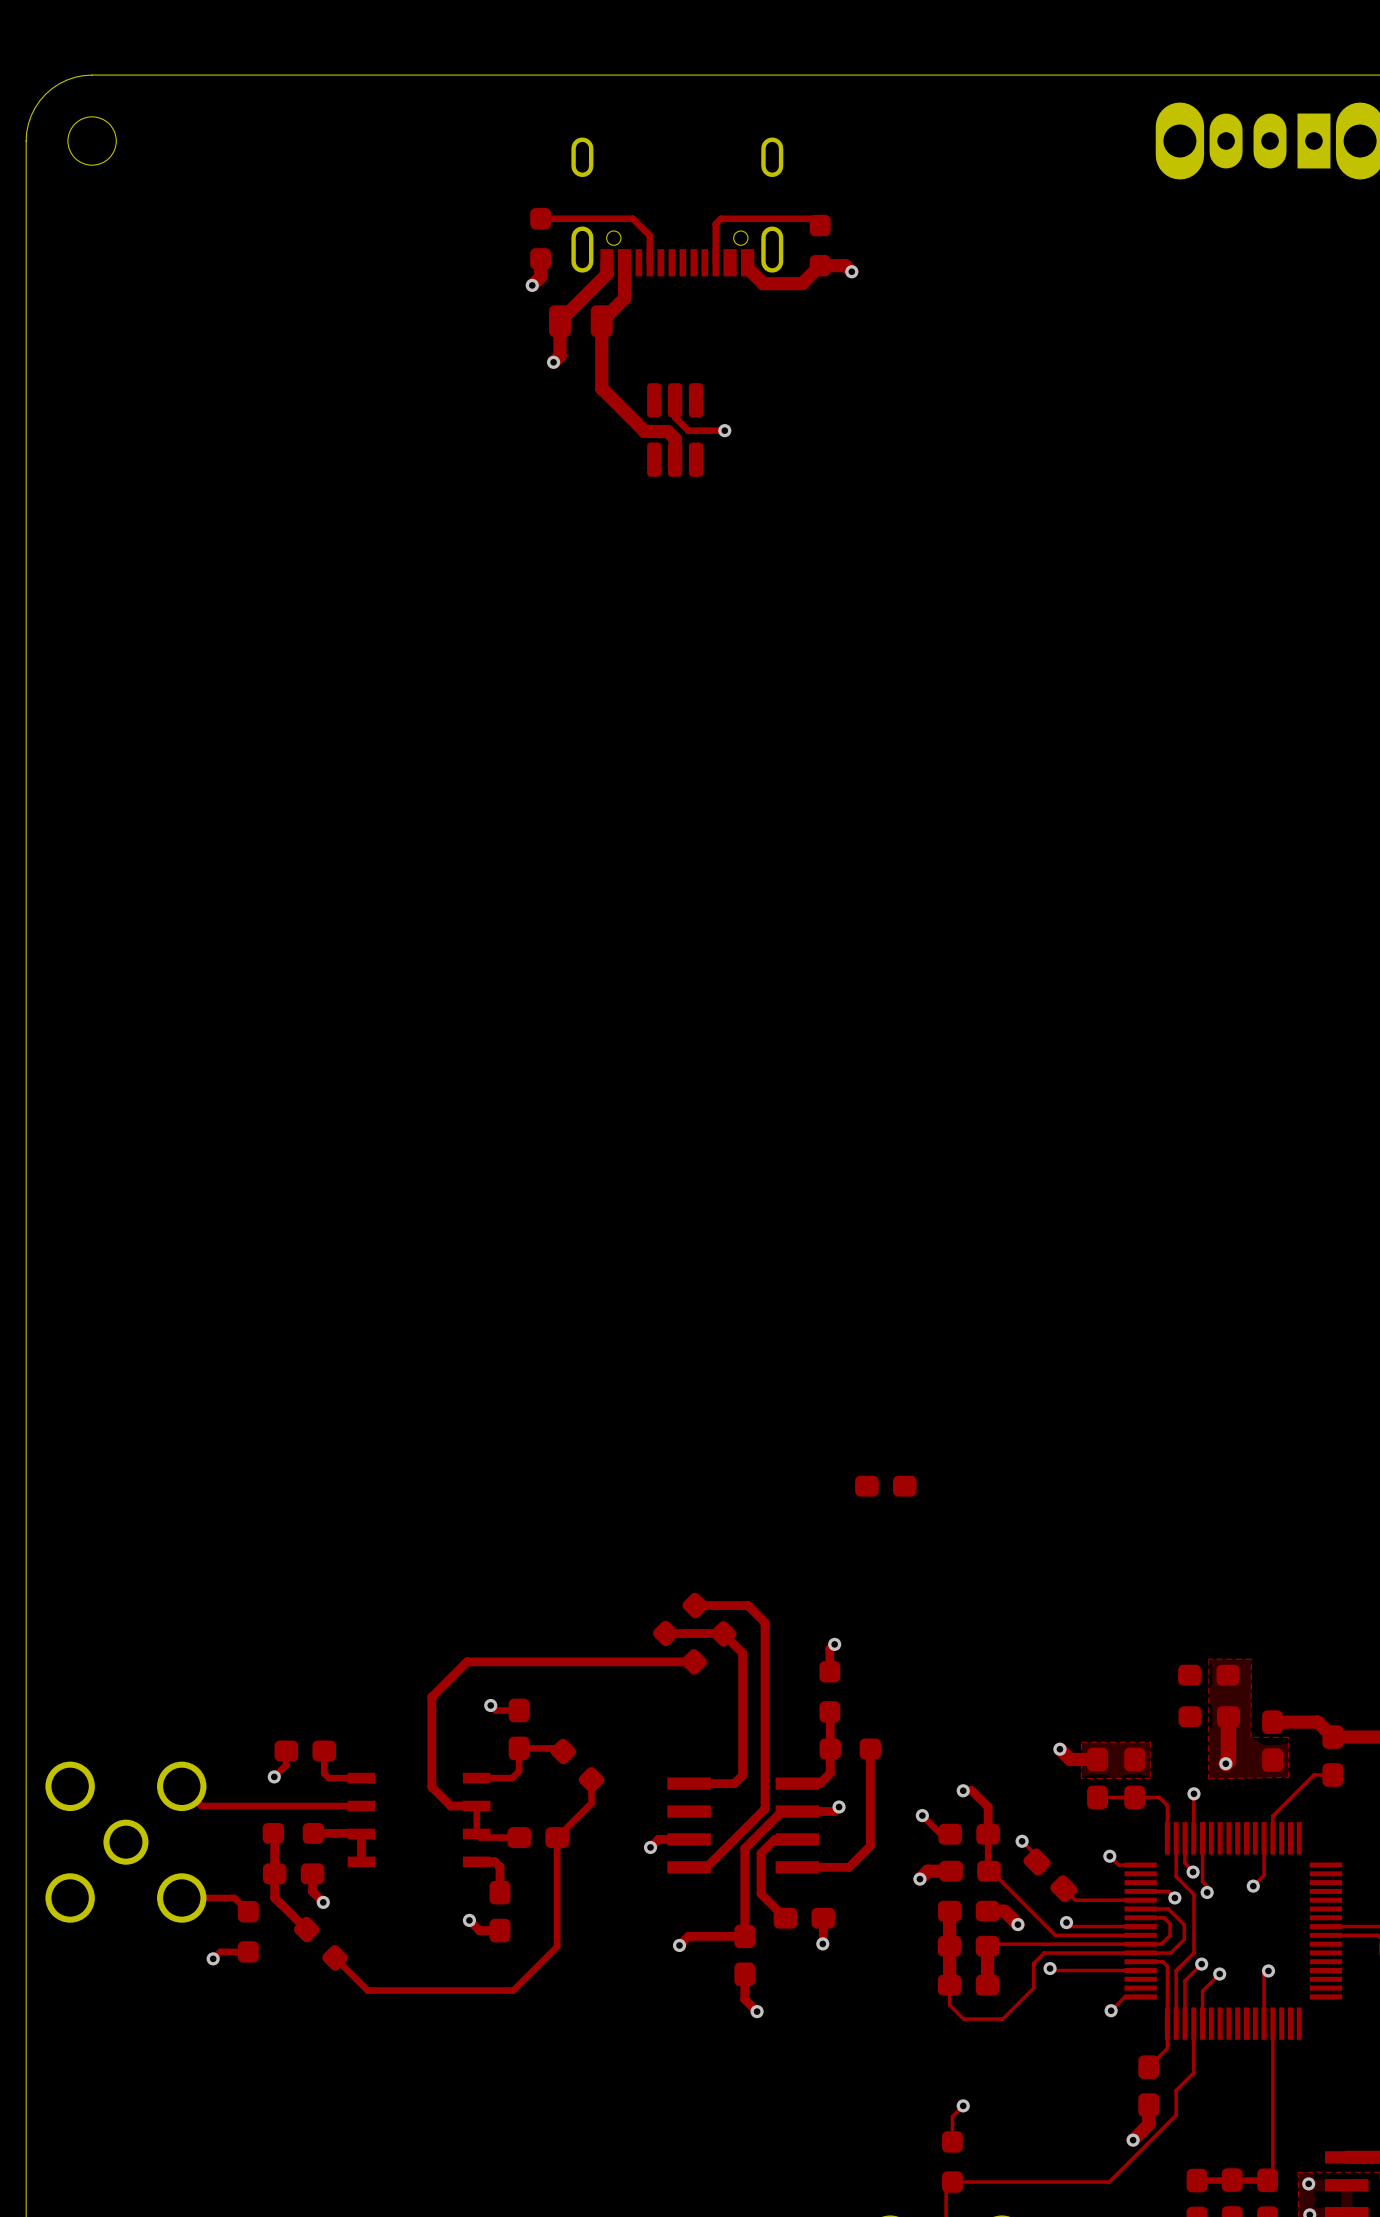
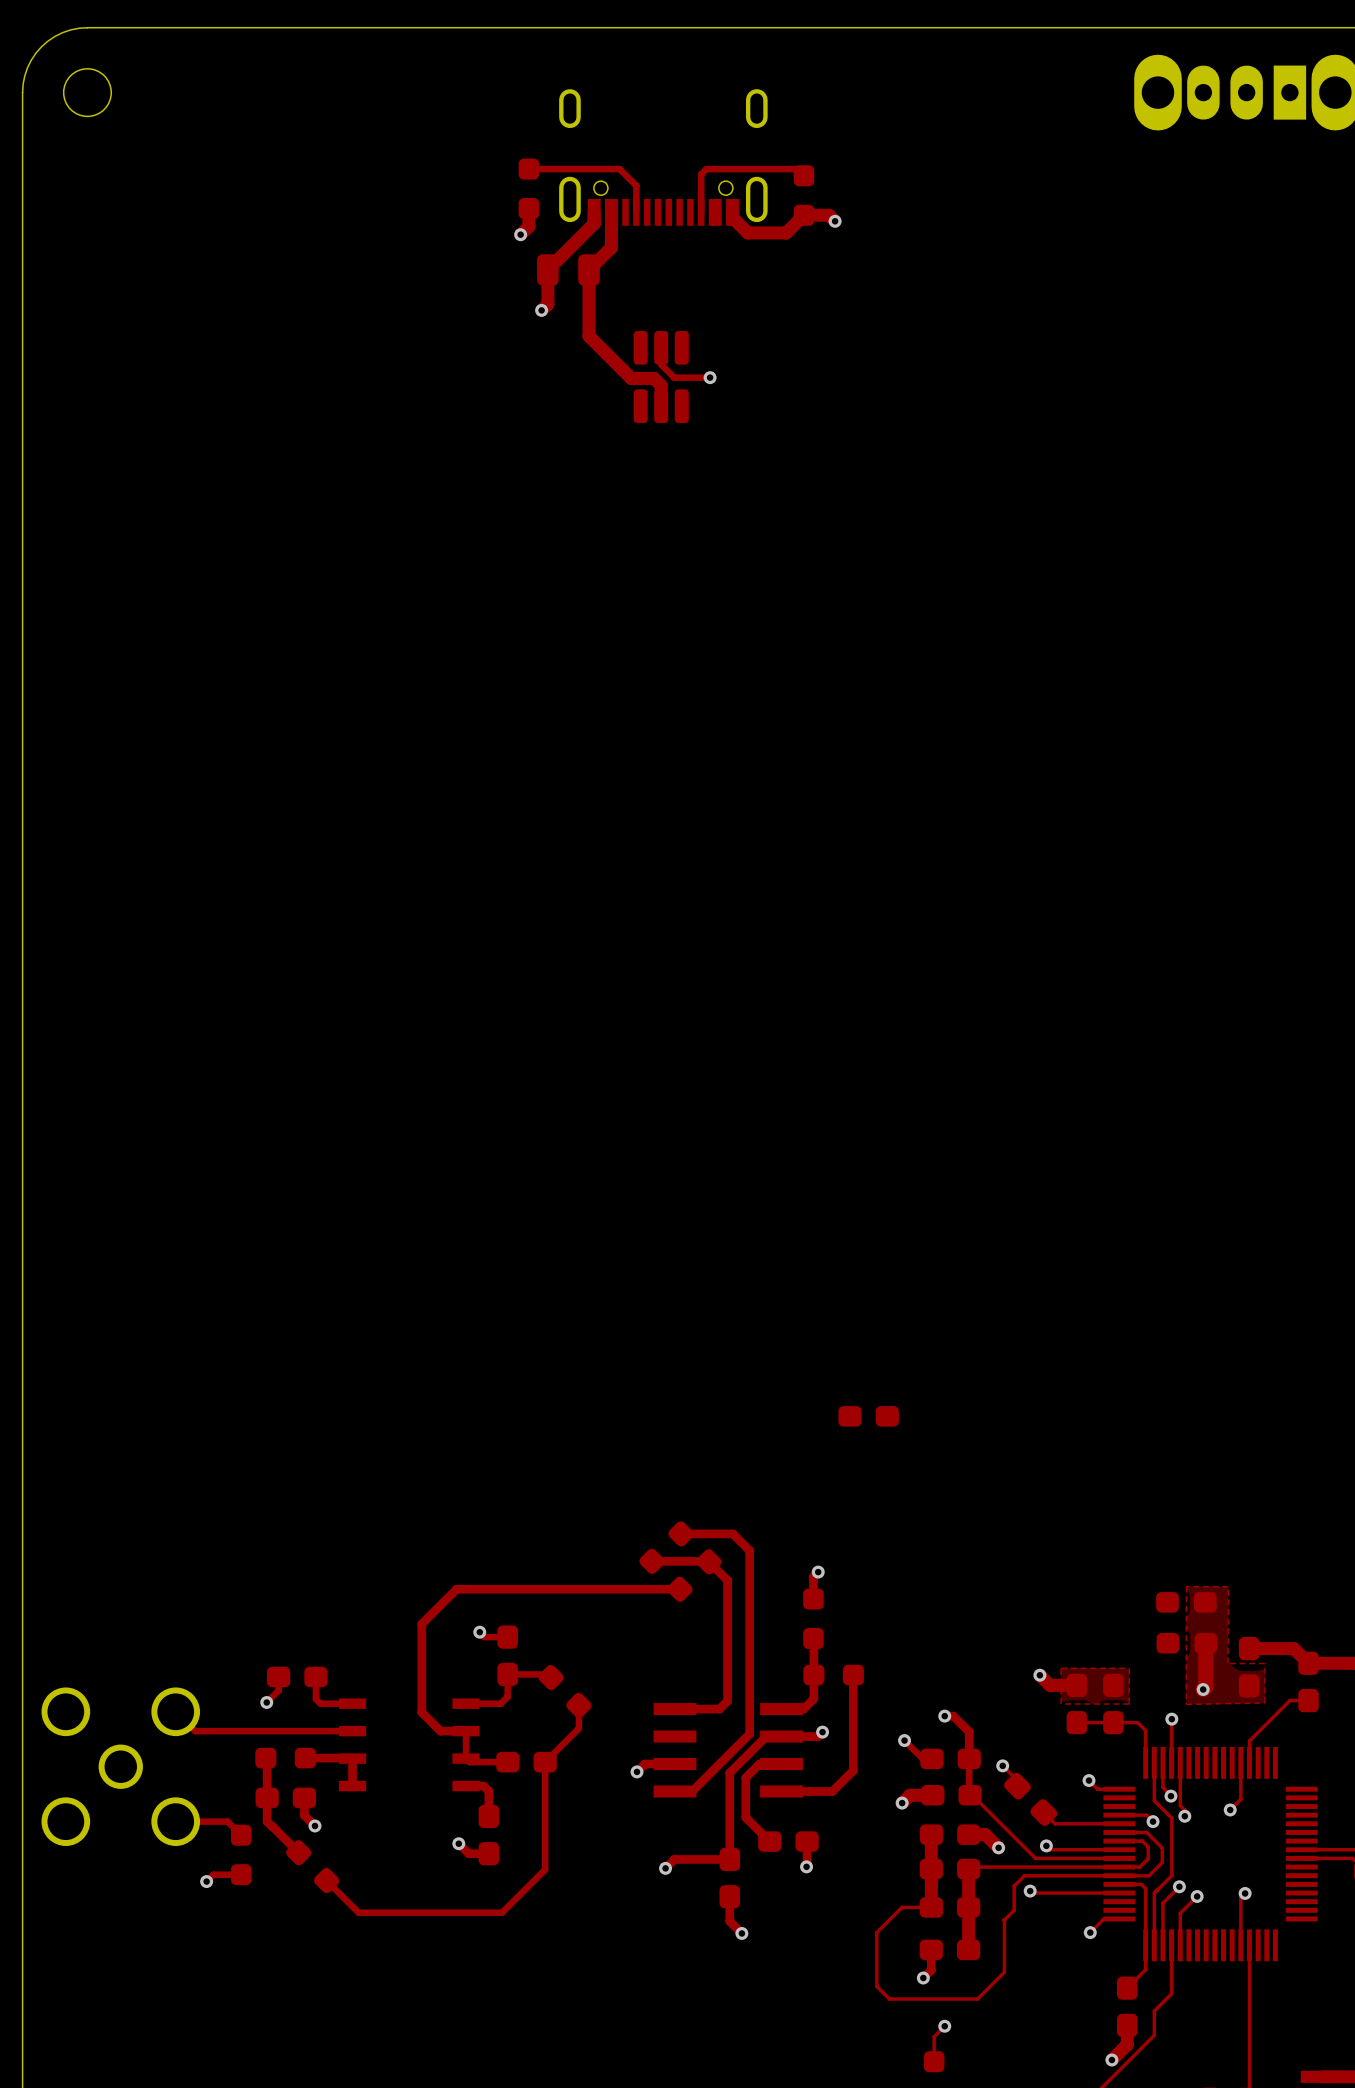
top track: (949, 1963) (949, 2005) (963, 2019) (1002, 2019) (1023, 1997) -> none
top track: none -> (931, 1907) (902, 1907) (876, 1932) (876, 1986) (889, 1999) (977, 1999) (1004, 1972) (1003, 1920)
top track: none -> (968, 1907) (968, 1949)
top track: none -> (931, 1949) (931, 1970) (923, 1978)
part: none -> (949, 1949)
via: none -> (923, 1978)

